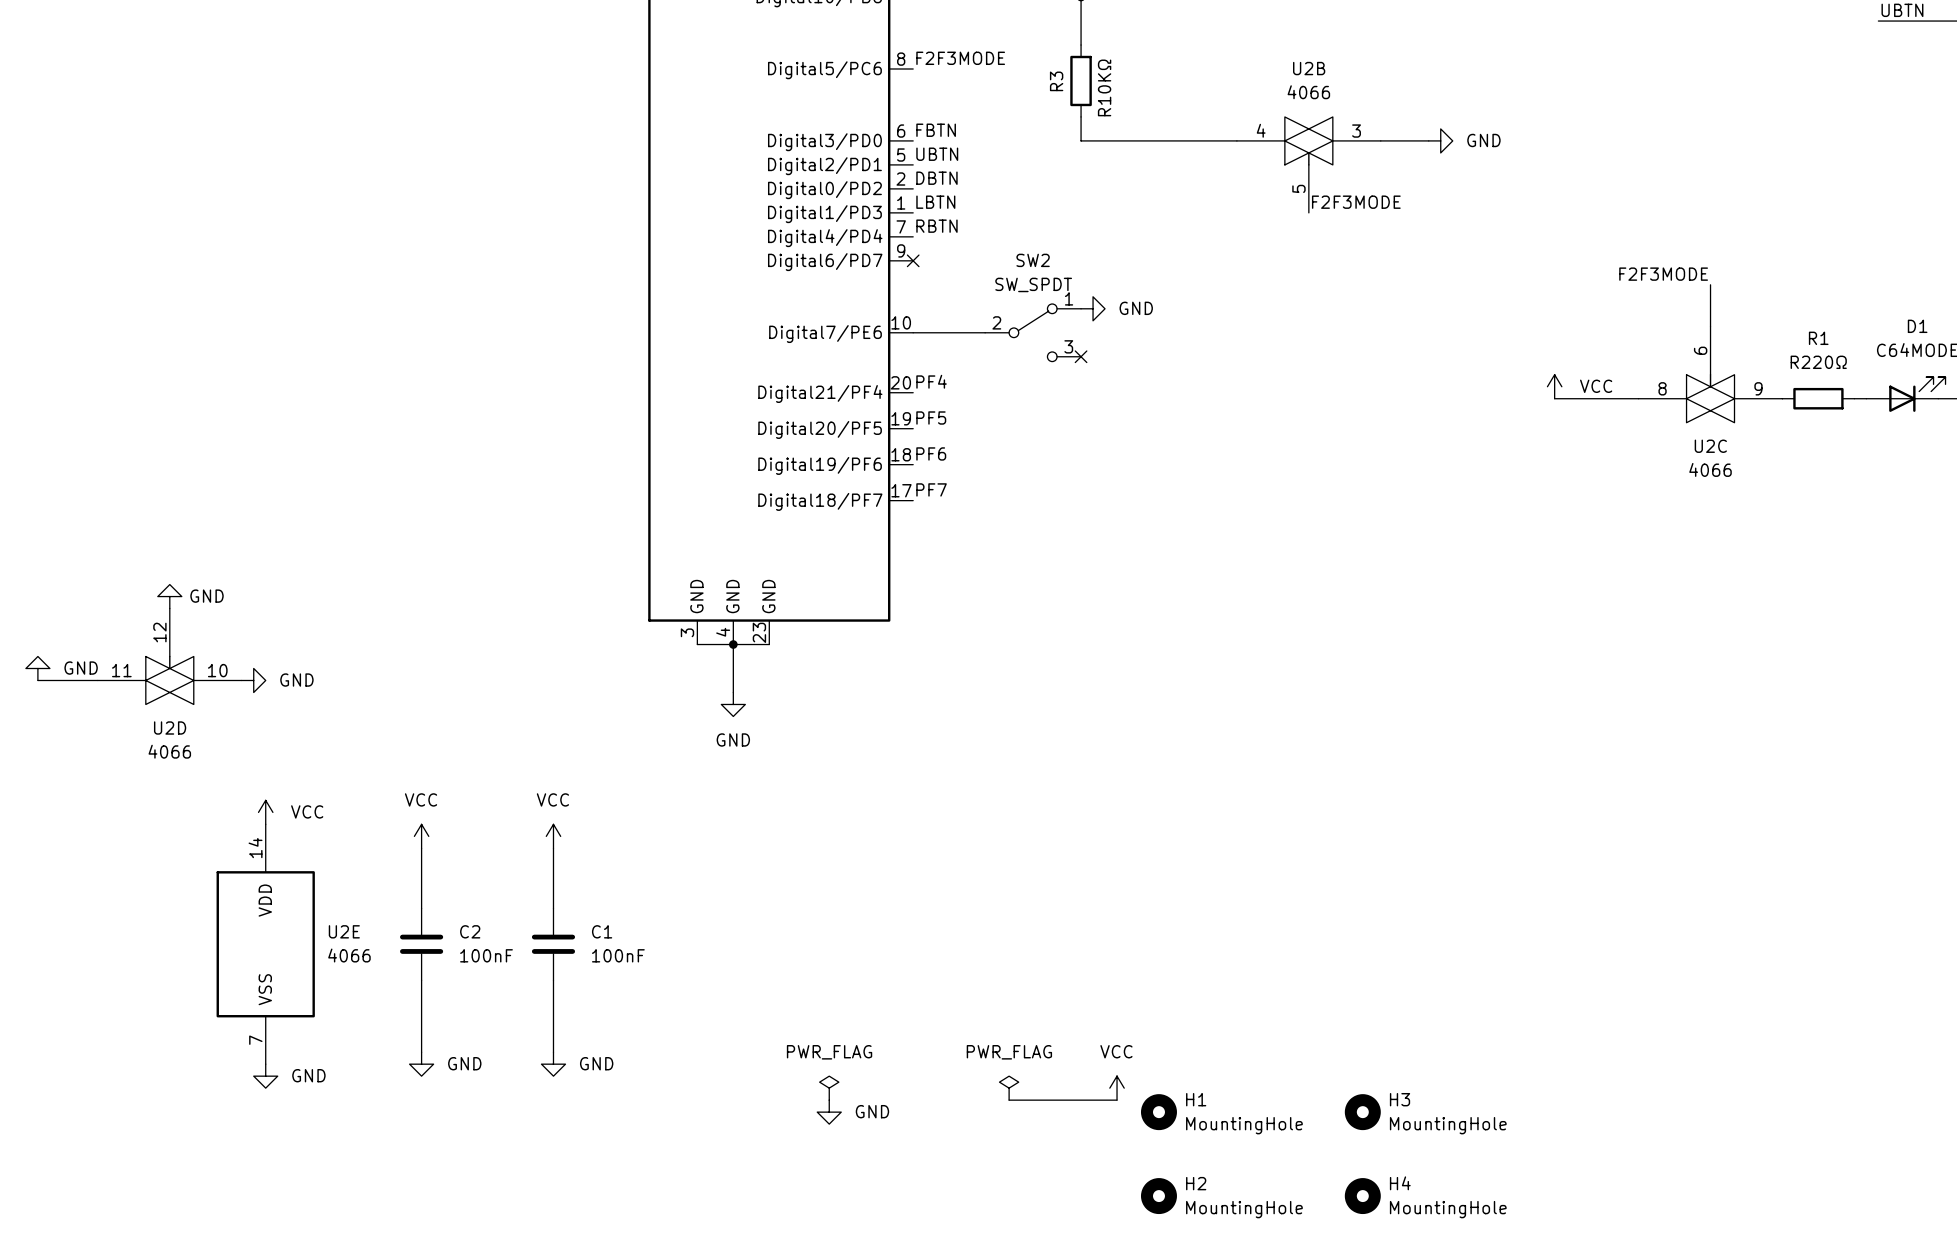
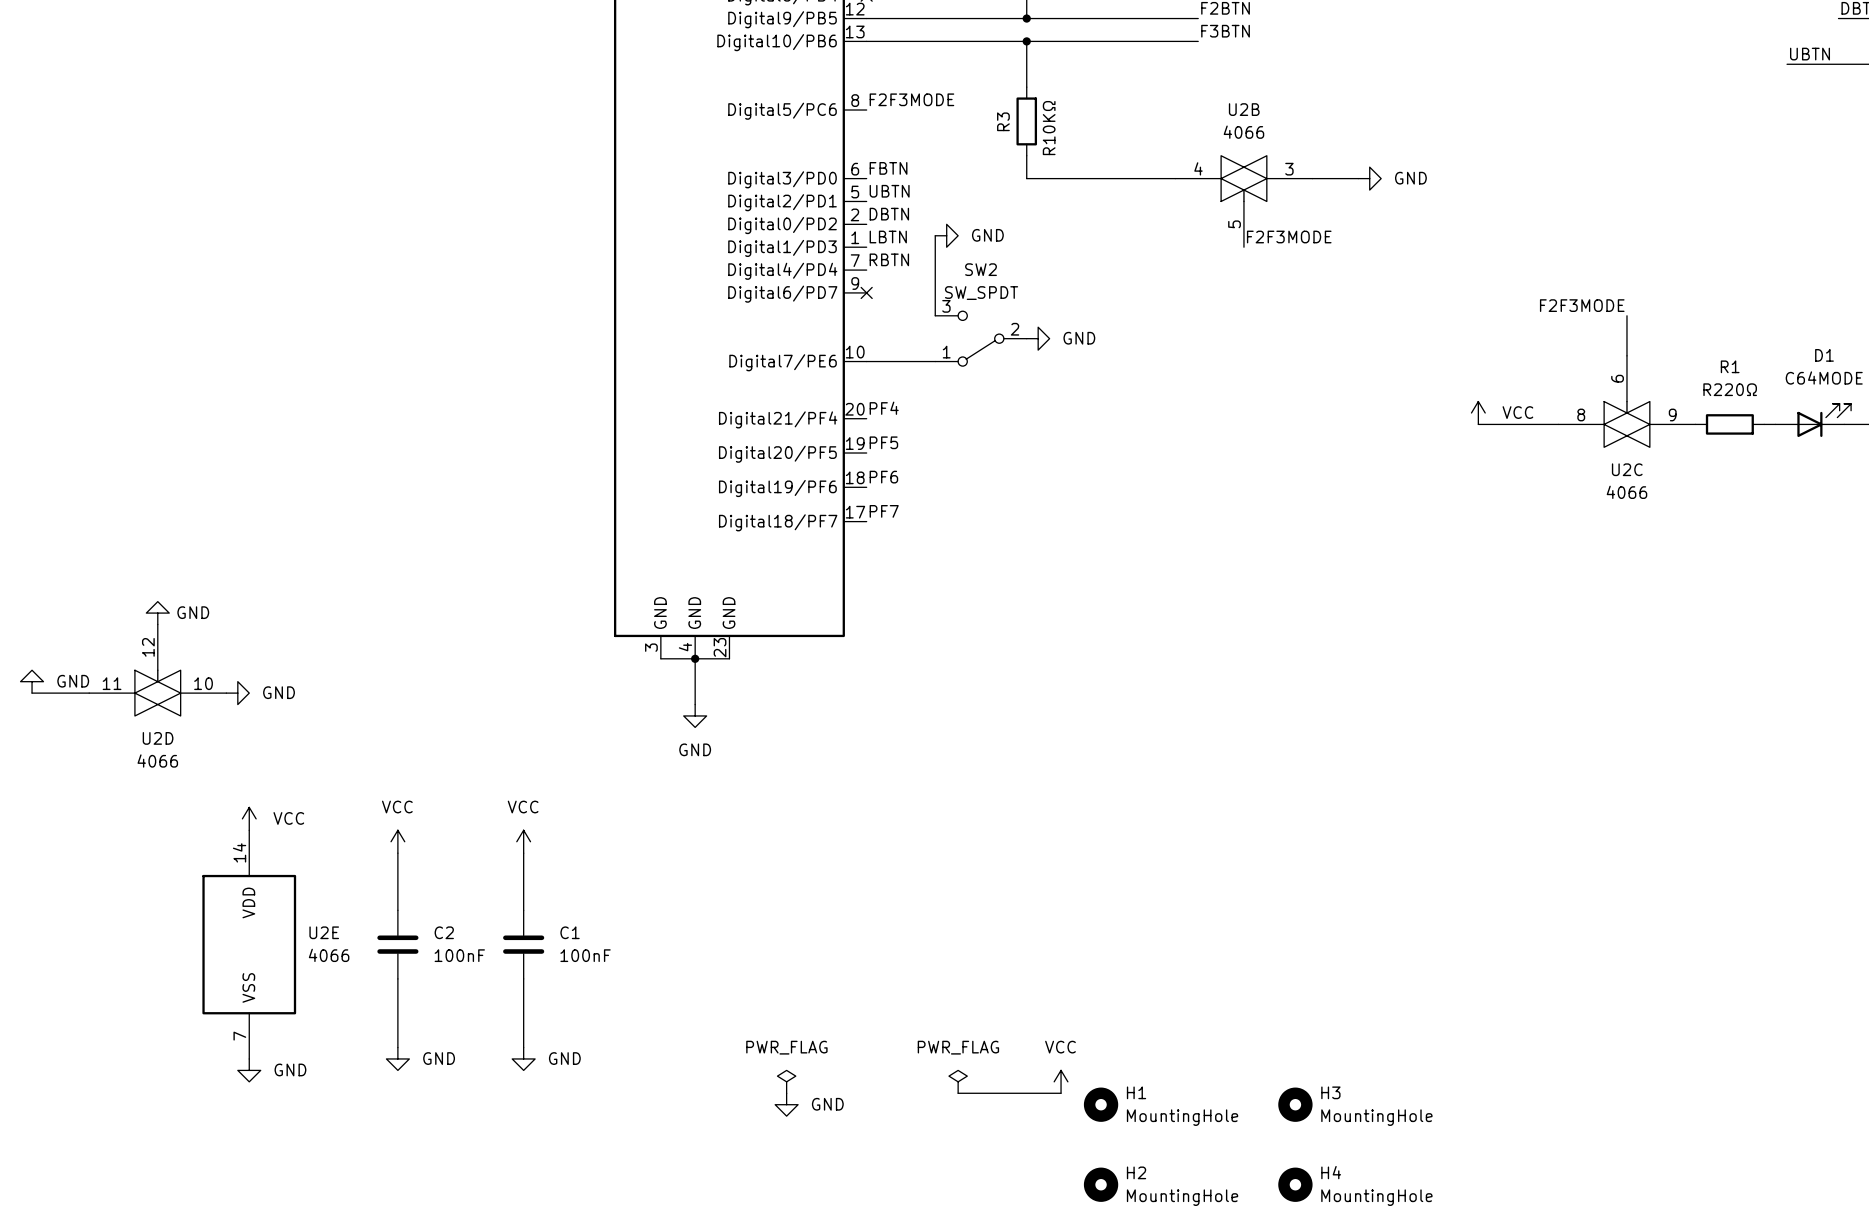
wire: none -> (935, 235) (935, 315)
power symbol: none -> GND (946, 235)
SW2 rotation: 0° (1033, 332) -> 180° (981, 338)
no-connect mark: (1081, 356) -> none

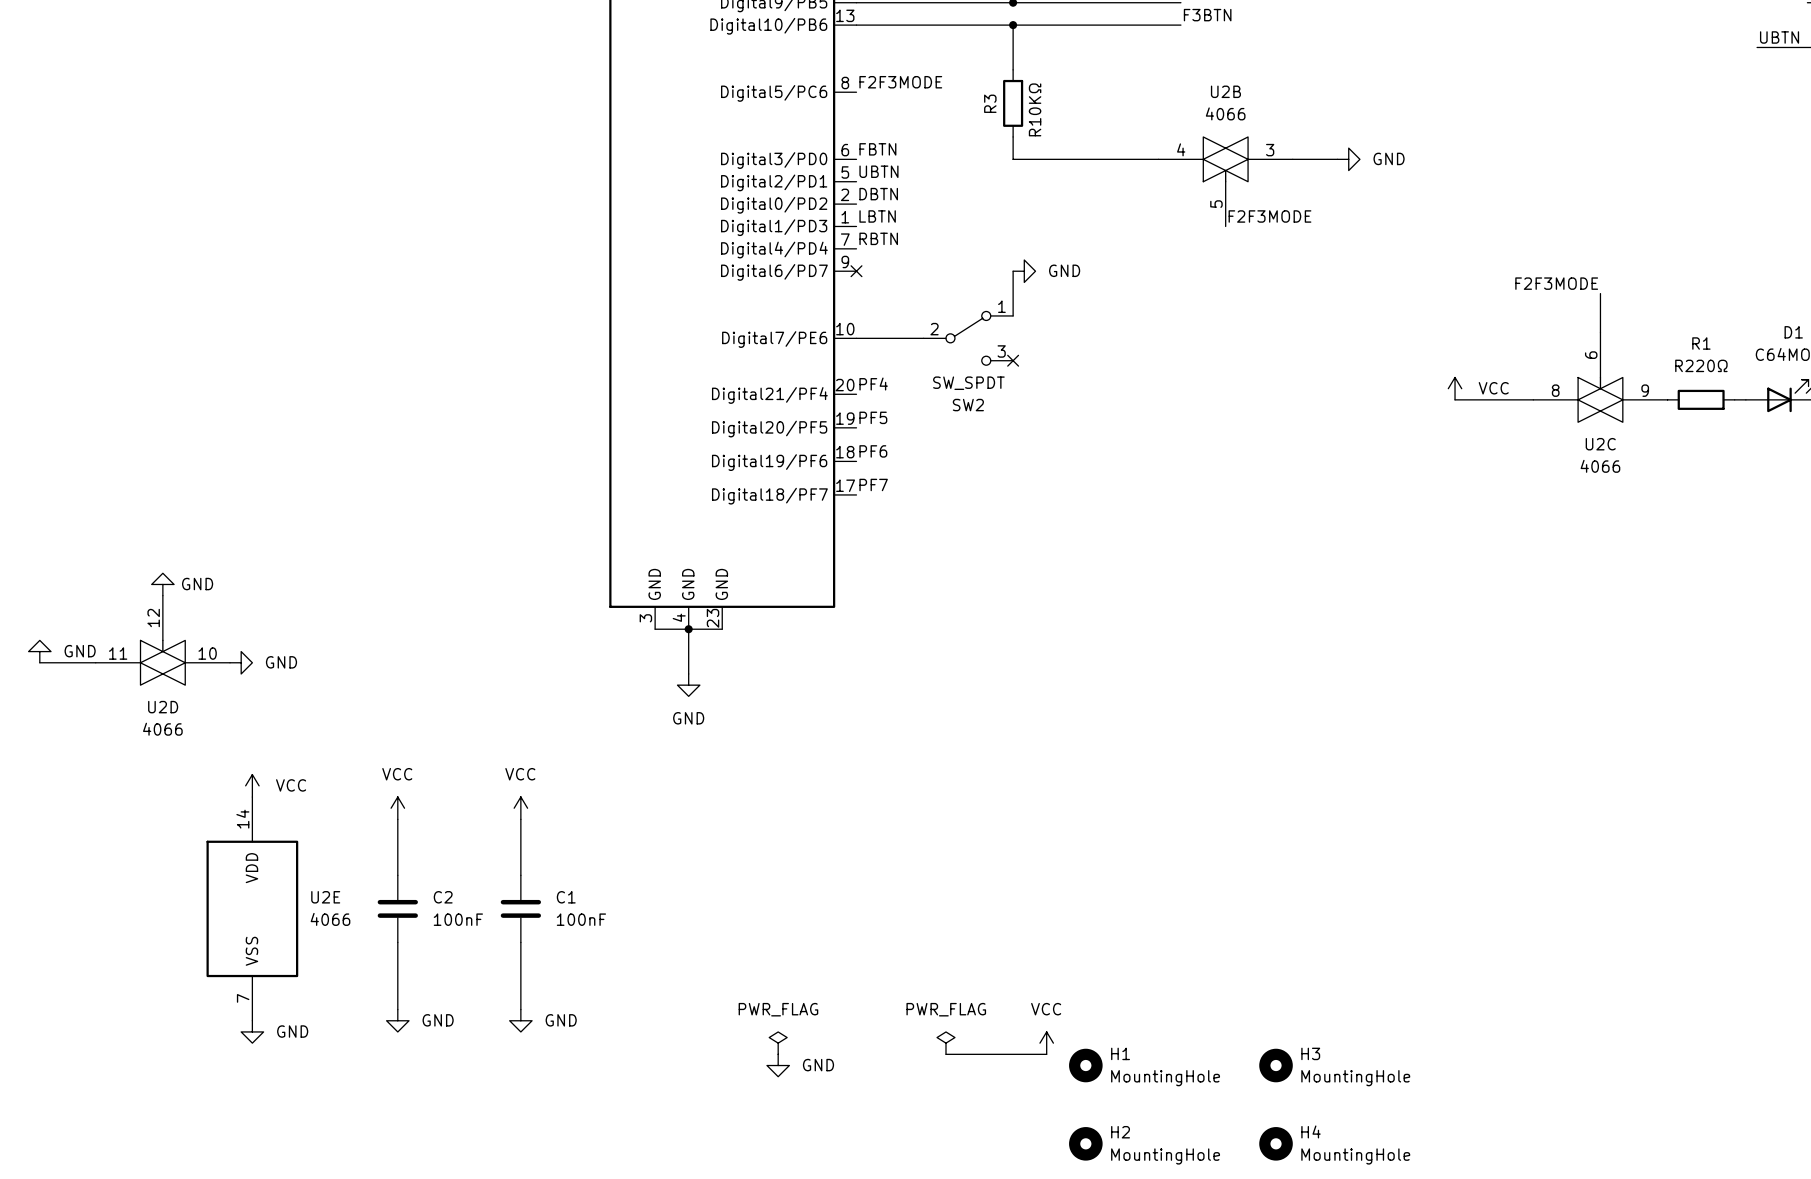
wire: (935, 235) (935, 315) -> none
power symbol: GND (946, 235) -> none
wire: none -> (1013, 271) (1013, 315)
SW2 rotation: 0° (981, 338) -> 180° (968, 338)
power symbol position: GND (1038, 338) -> GND (1024, 271)
no-connect mark: none -> (1013, 360)

